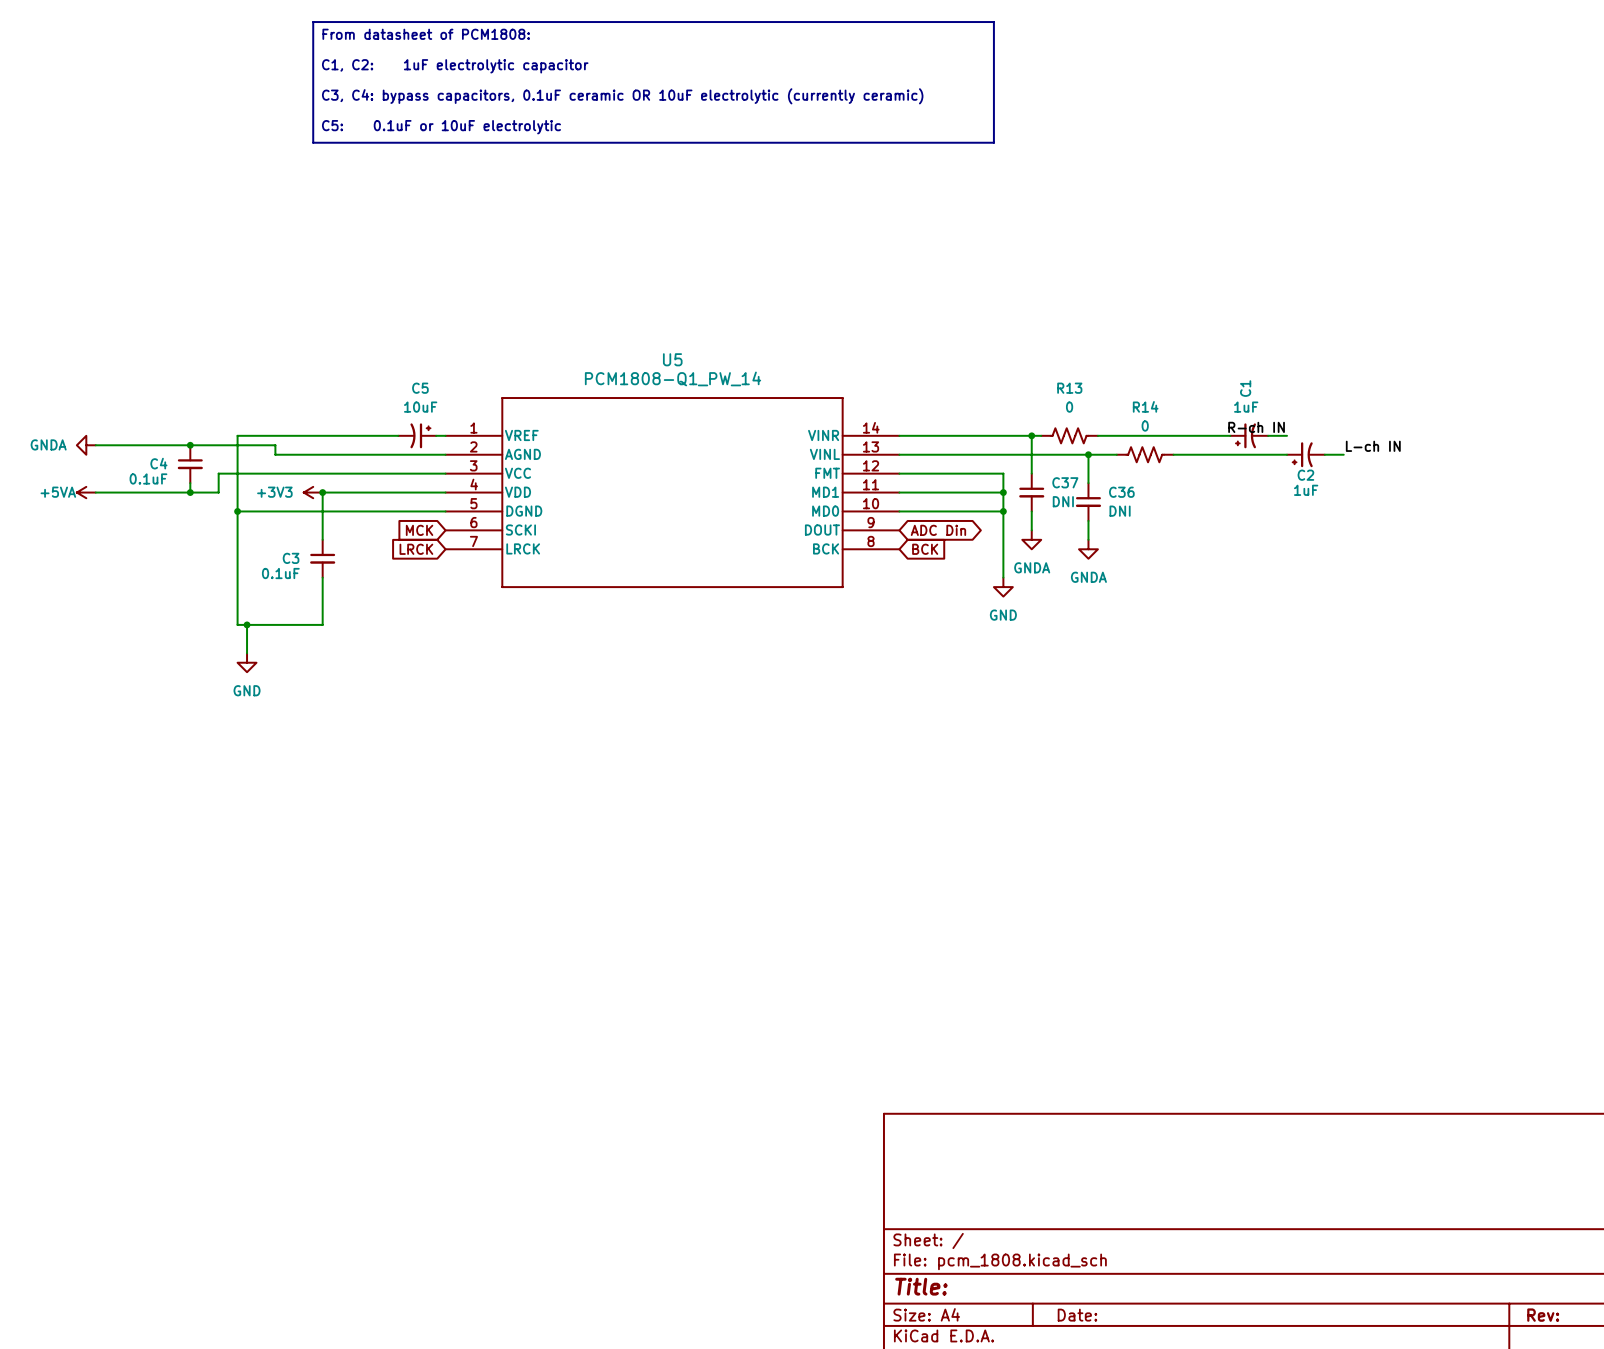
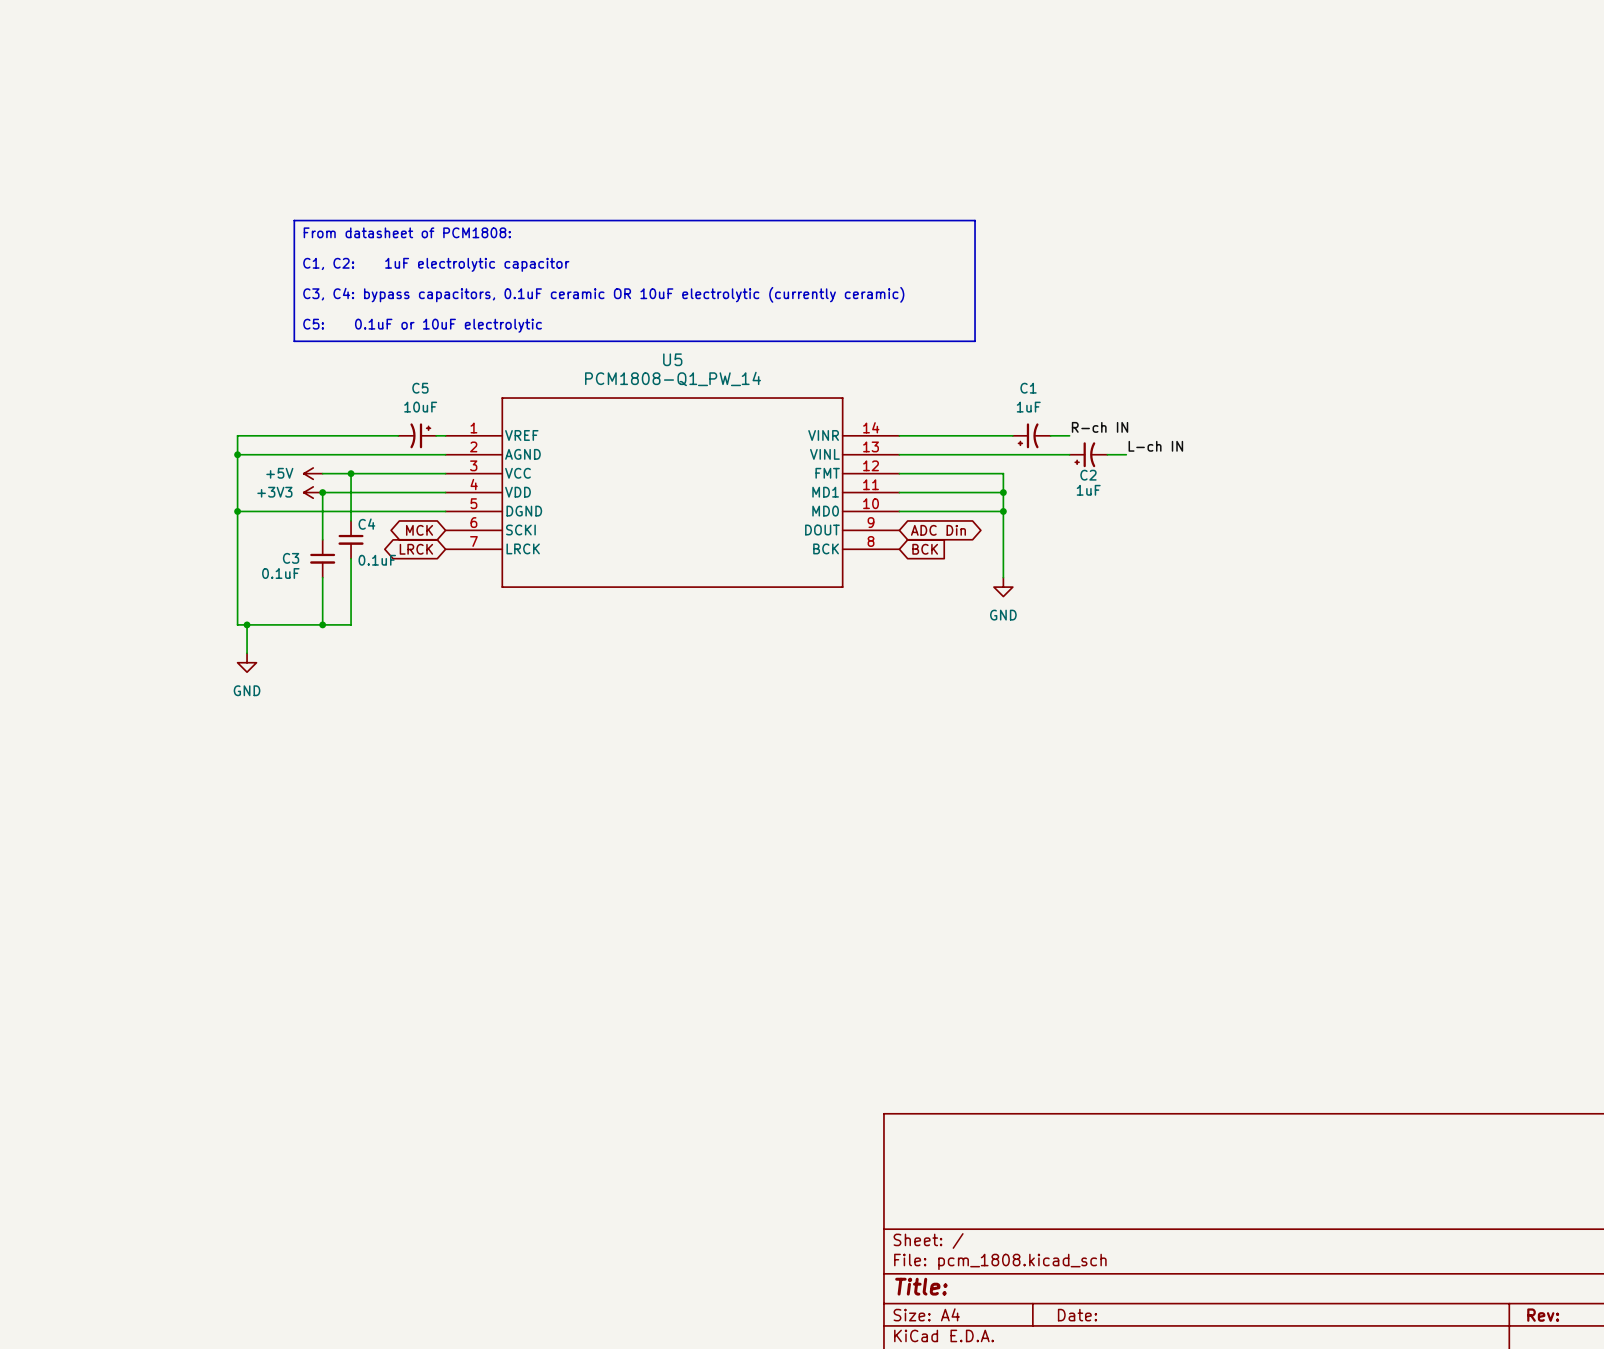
line: (313, 22) (993, 22) (993, 142) (313, 142) (313, 22) -> none
text: From datasheet of PCM1808: (426, 34) -> none
text: C1, C2: 1uF electrolytic capacitor (455, 66) -> none
text: C3, C4: bypass capacitors, 0.1uF ceramic OR 10uF electrolytic (currently ceramic) (622, 96) -> none
text: C5: 0.1uF or 10uF electrolytic (441, 127) -> none
line: none -> (294, 220) (975, 220) (975, 341) (294, 341) (294, 220)
text: none -> From datasheet of PCM1808: (407, 232)
text: none -> C1, C2: 1uF electrolytic capacitor (436, 264)
text: none -> C3, C4: bypass capacitors, 0.1uF ceramic OR 10uF electrolytic (currently ceramic) (603, 294)
text: none -> C5: 0.1uF or 10uF electrolytic (422, 325)
C1 name rotation: 0° (1245, 388) -> 90° clockwise (1028, 388)
label: none -> R-ch IN (1100, 427)
label: R-ch IN (1256, 427) -> none
wire: (1031, 435) (1031, 473) -> none
junction: (1031, 435) -> none
wire: none -> (1050, 435) (1069, 435)
R13: 0 (1069, 435) -> none
wire: (1097, 435) (1230, 435) -> none
C1 position: (1249, 435) -> (1031, 435)
wire: (1268, 435) (1287, 435) -> none
power symbol: GNDA (86, 445) -> none
wire: (95, 445) (275, 445) (275, 454) -> (237, 454) (275, 454)
junction: (190, 445) -> none
label: none -> L-ch IN (1155, 446)
label: L-ch IN (1373, 446) -> none
junction: none -> (237, 454)
wire: (1088, 454) (1088, 483) -> none
junction: (1088, 454) -> none
R14: 0 (1145, 454) -> none
wire: (1173, 454) (1287, 454) -> none
C2 position: (1305, 454) -> (1088, 454)
wire: (1324, 454) (1343, 454) -> none
C4 name position: C4 (158, 463) -> C4 (366, 524)
C4 position: (190, 464) -> (351, 539)
power symbol: none -> +5V (313, 473)
wire: (322, 473) (218, 473) (218, 492) (95, 492) -> none
wire: none -> (351, 473) (351, 520)
junction: none -> (351, 473)
C4 value position: 0.1uF (148, 478) -> 0.1uF (377, 560)
wire: (190, 483) (190, 492) -> none
power symbol: +5VA (86, 492) -> none
junction: (190, 492) -> none
C37: DNI (1031, 492) -> none
C36: DNI (1088, 502) -> none
wire: (1031, 511) (1031, 530) -> none
wire: (1088, 520) (1088, 539) -> none
global label shape: input (419, 530) -> bidirectional (419, 530)
power symbol: GNDA (1031, 539) -> none
global label shape: input (416, 549) -> bidirectional (416, 549)
power symbol: GNDA (1088, 549) -> none
wire: none -> (351, 558) (351, 624) (322, 624)
junction: none -> (322, 624)

